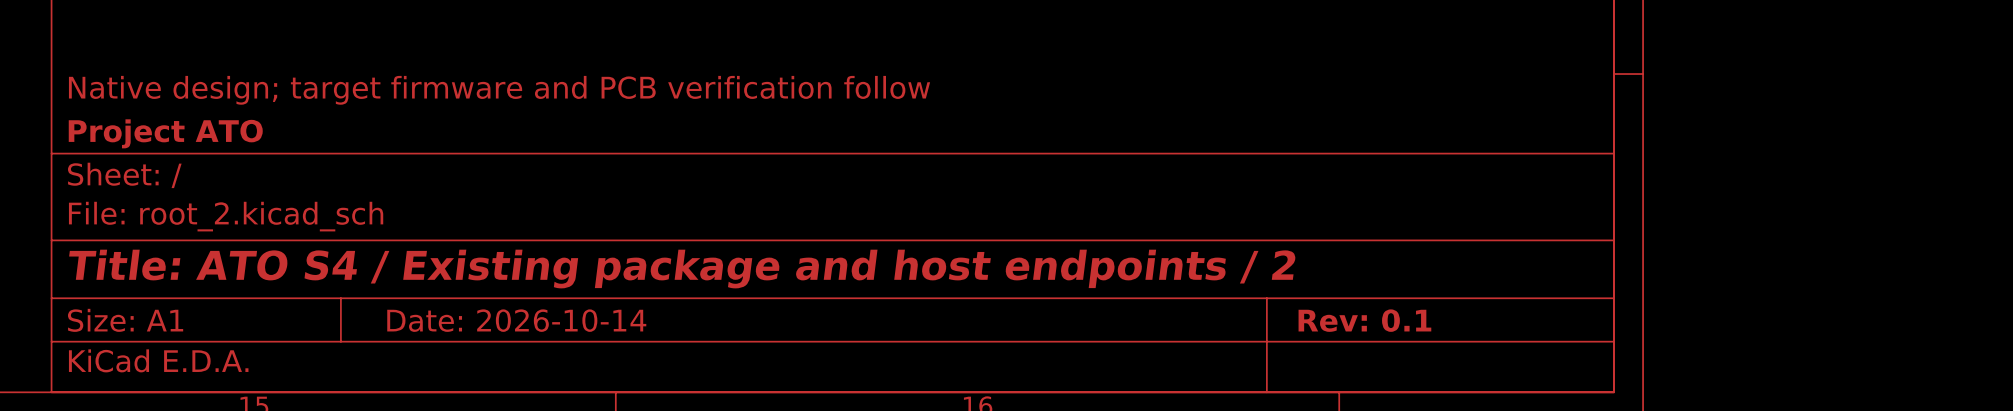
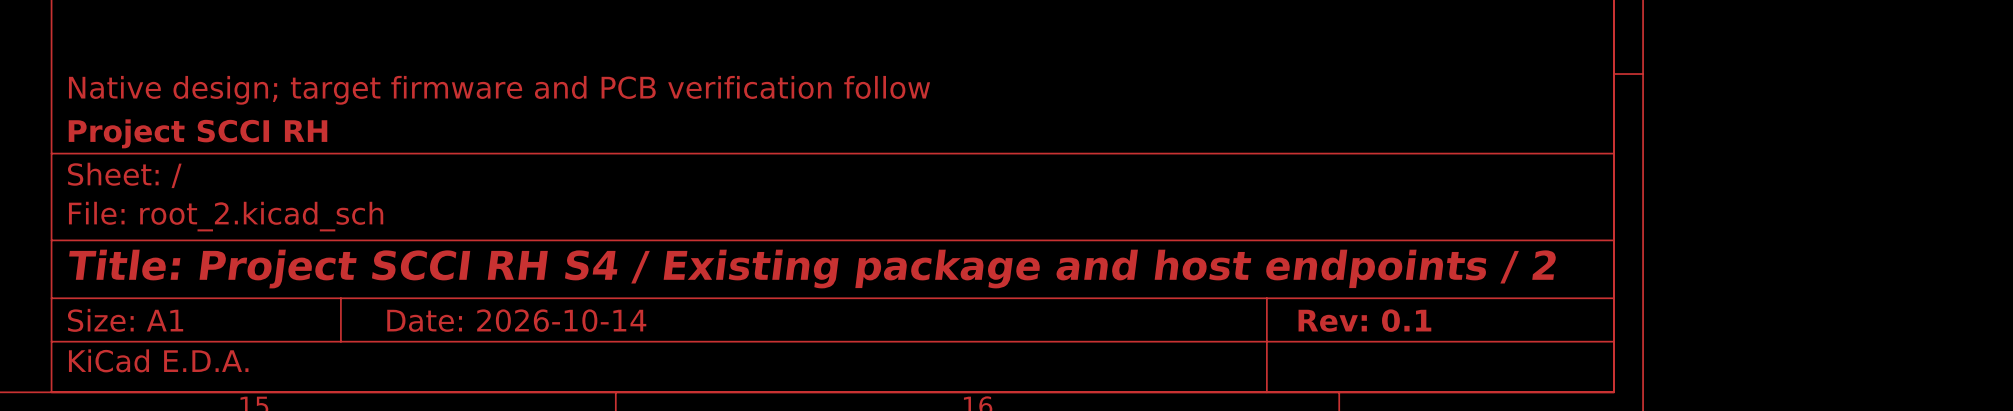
title block: Project ATO (165, 133) -> Project SCCI RH (198, 133)
title block: Title: ATO S4 / Existing package and host endpoints / 2 (682, 269) -> Title: Project SCCI RH S4 / Existing package and host endpoints / 2 (812, 269)

